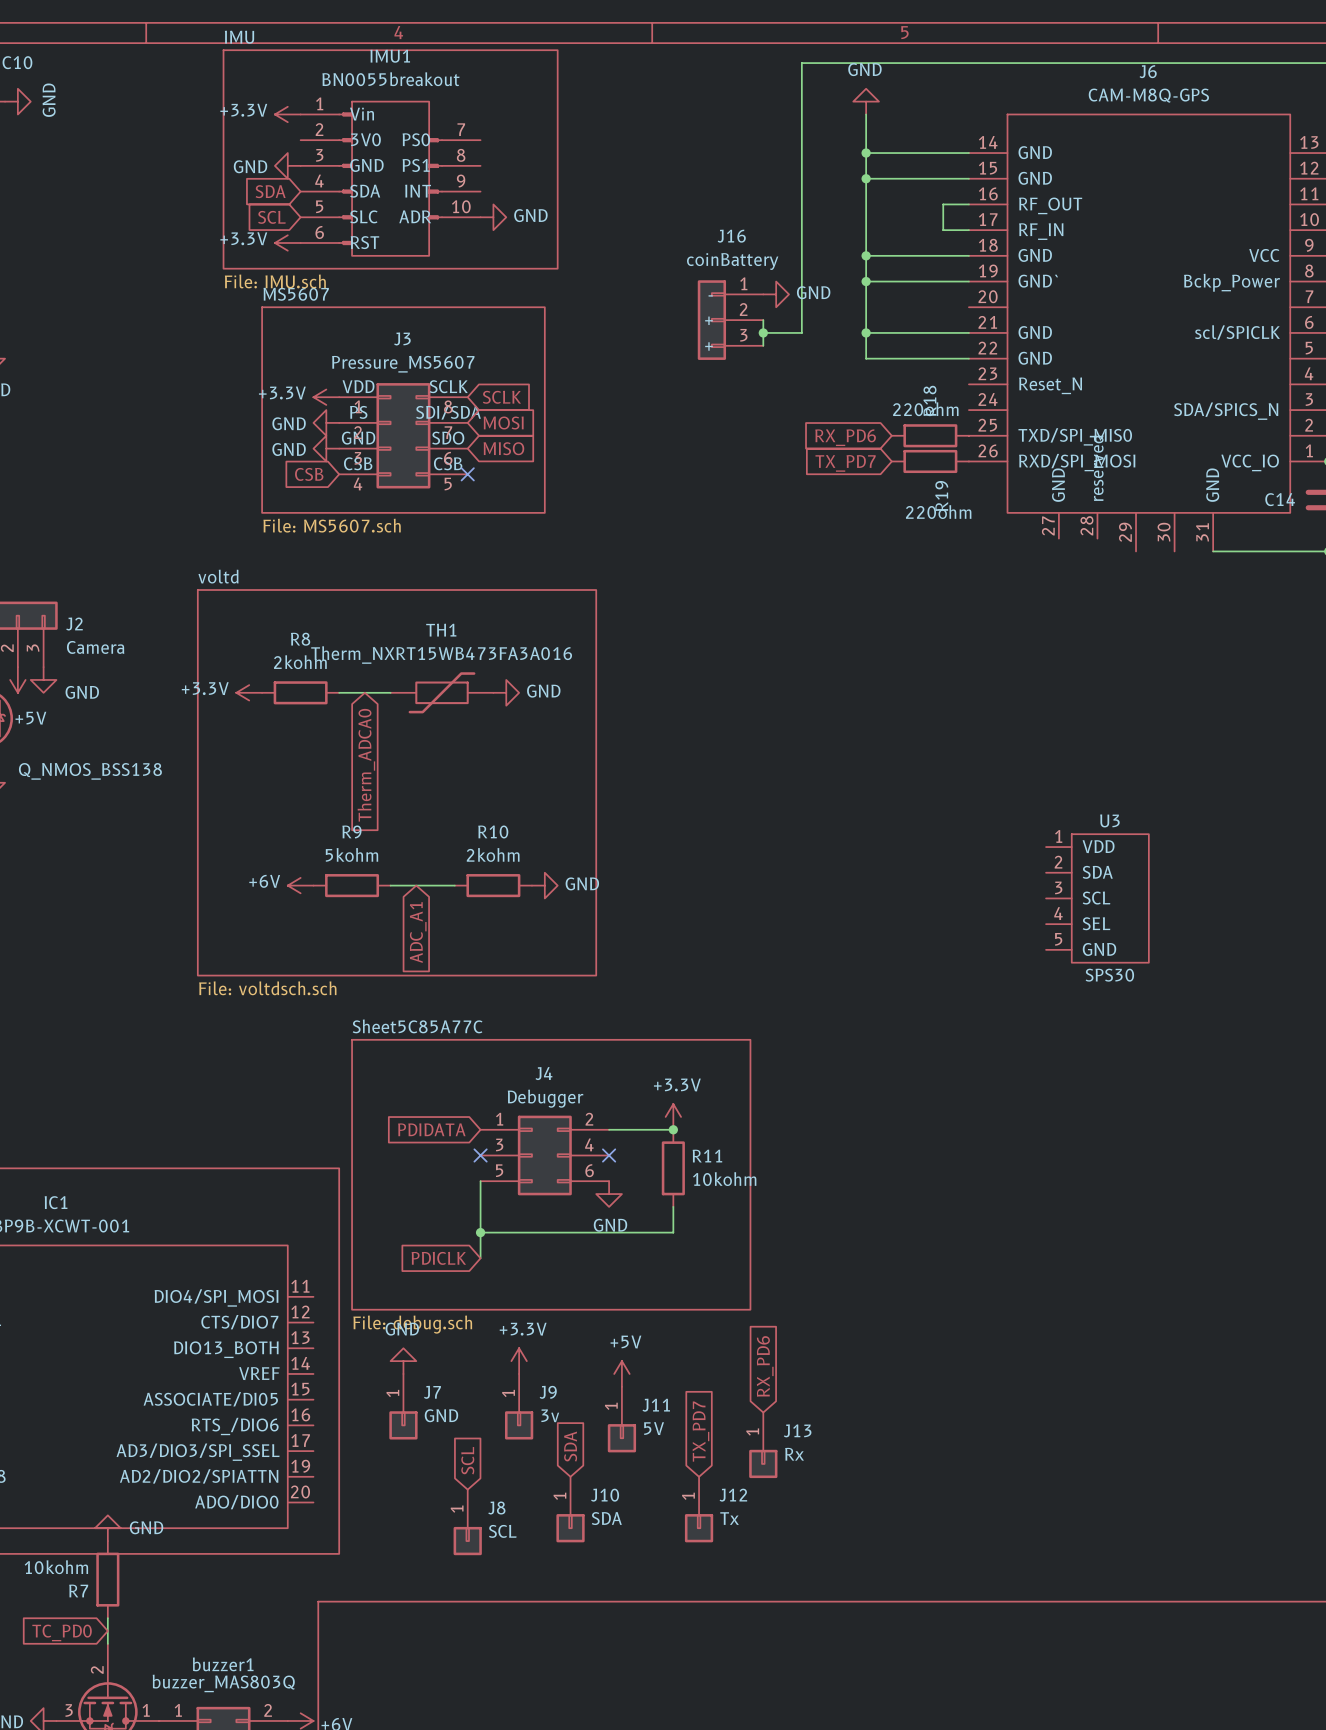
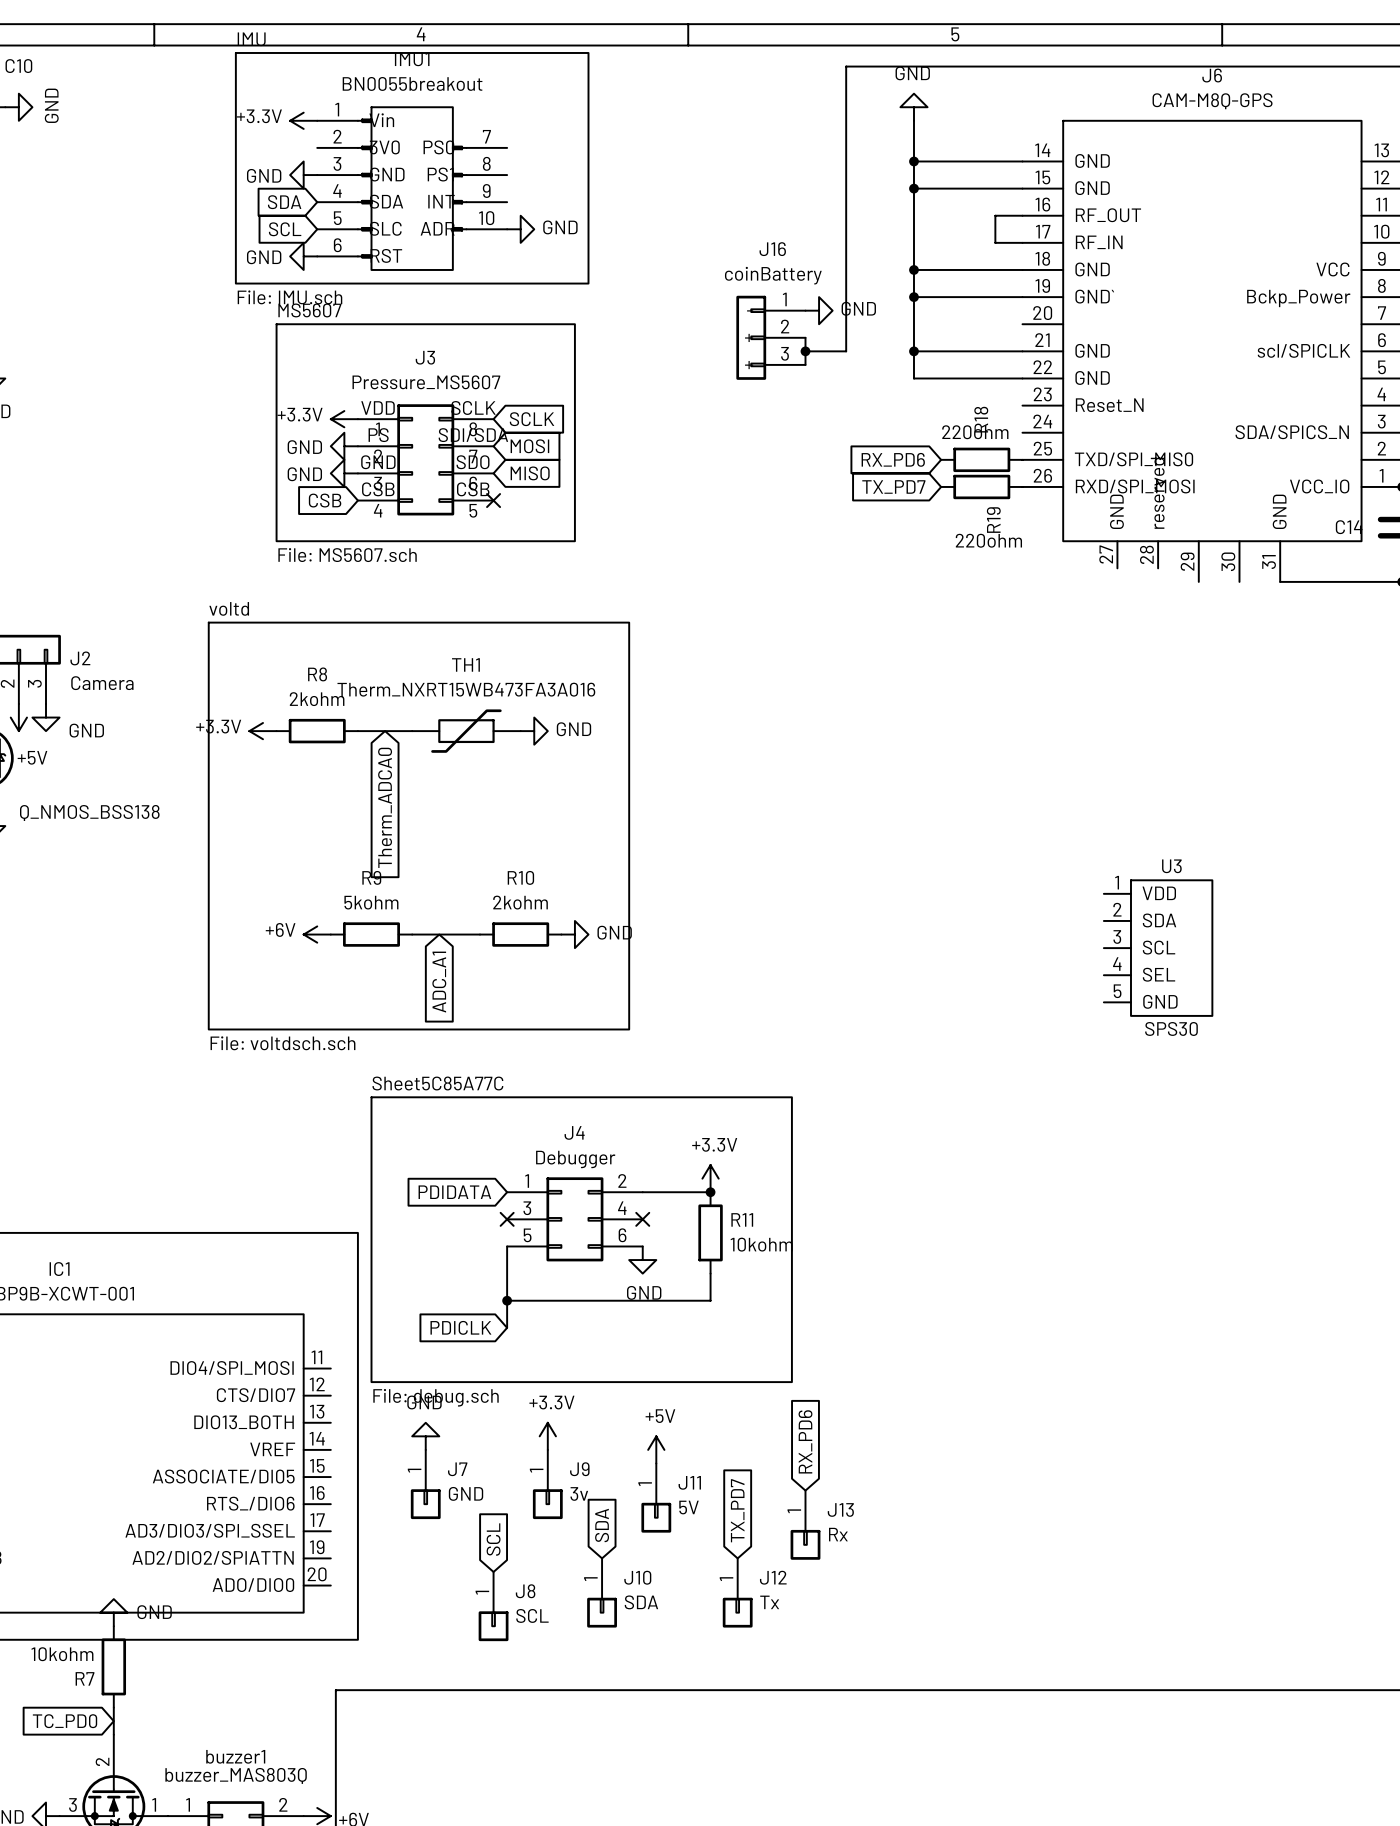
power symbol: +3.3V (287, 242) -> GND (303, 256)

